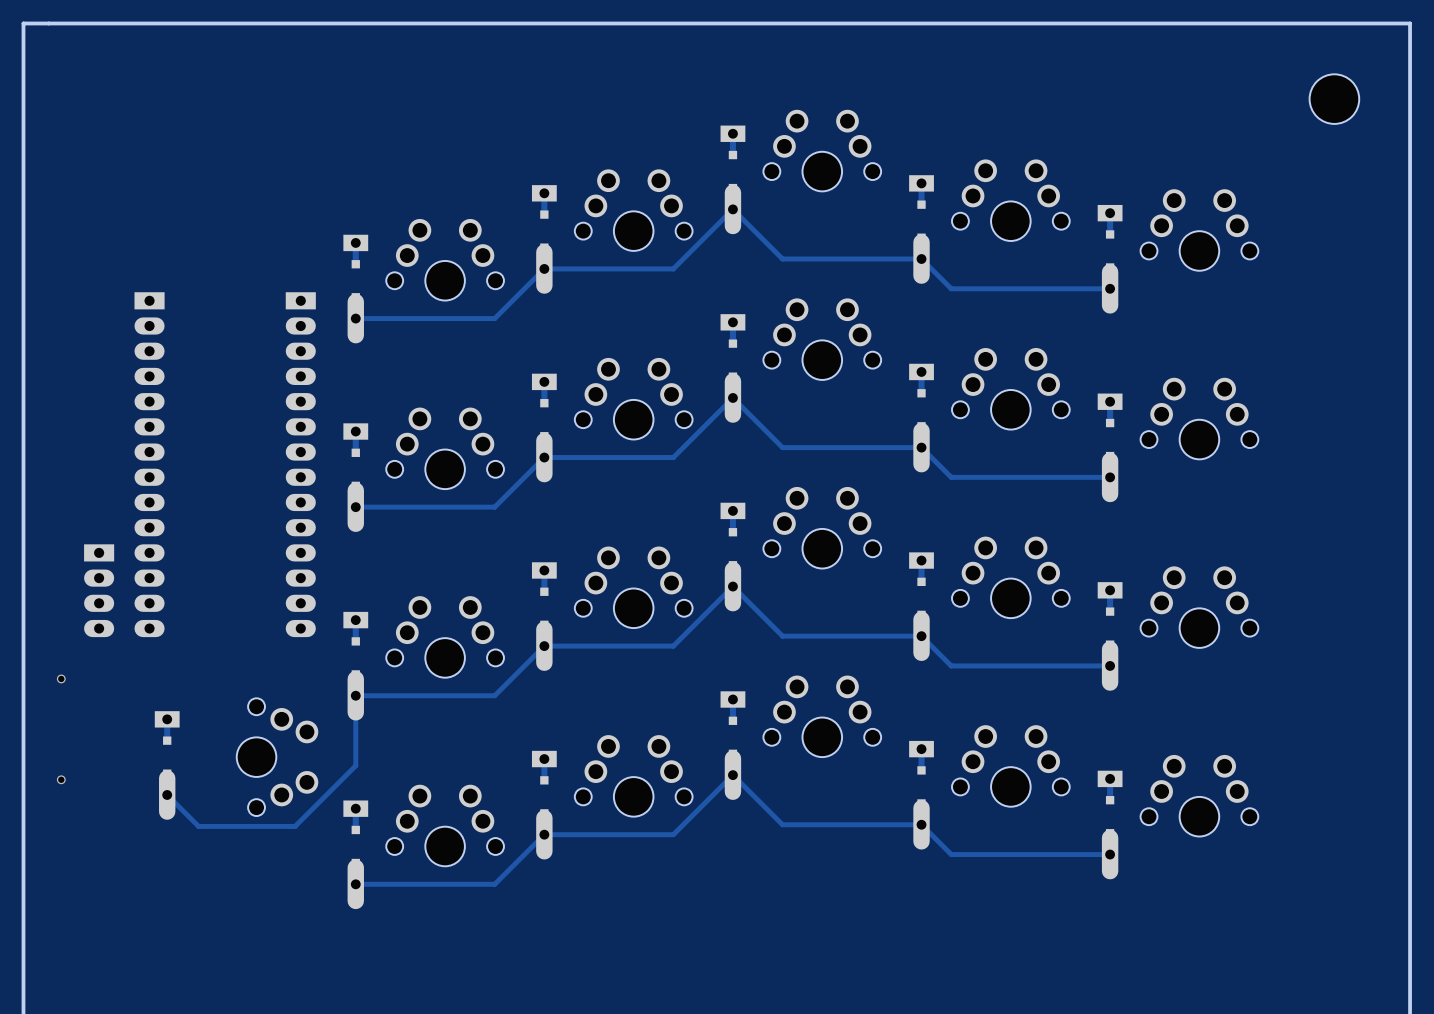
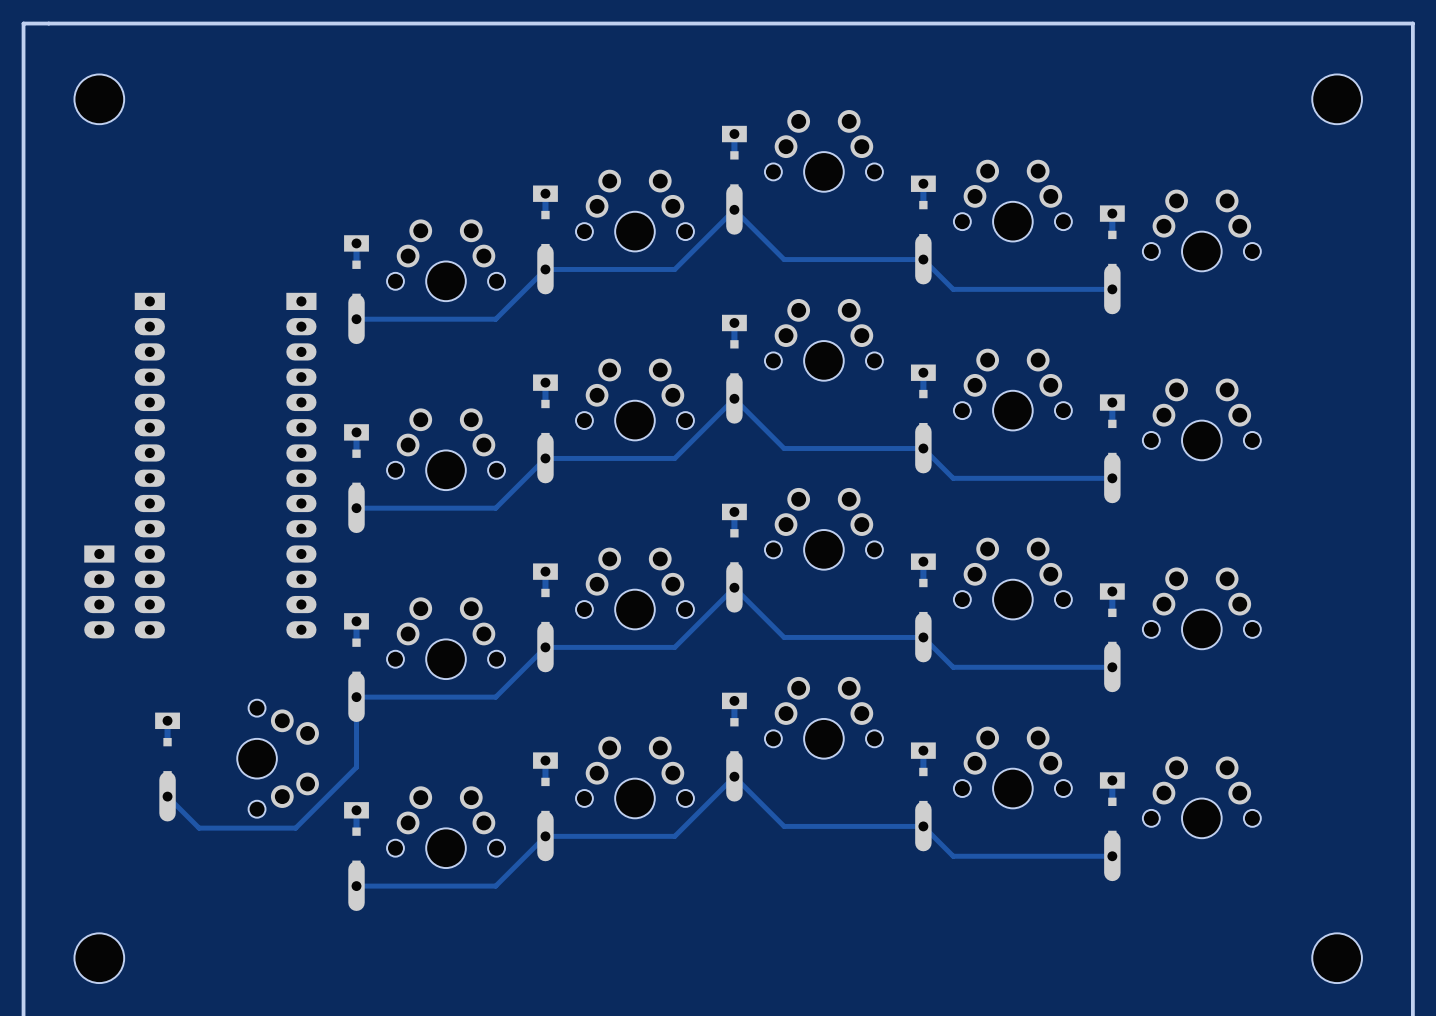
part: none -> (99, 99)
via: (61, 678) -> none
via: (61, 779) -> none
part: none -> (99, 958)
part: none -> (1337, 958)

